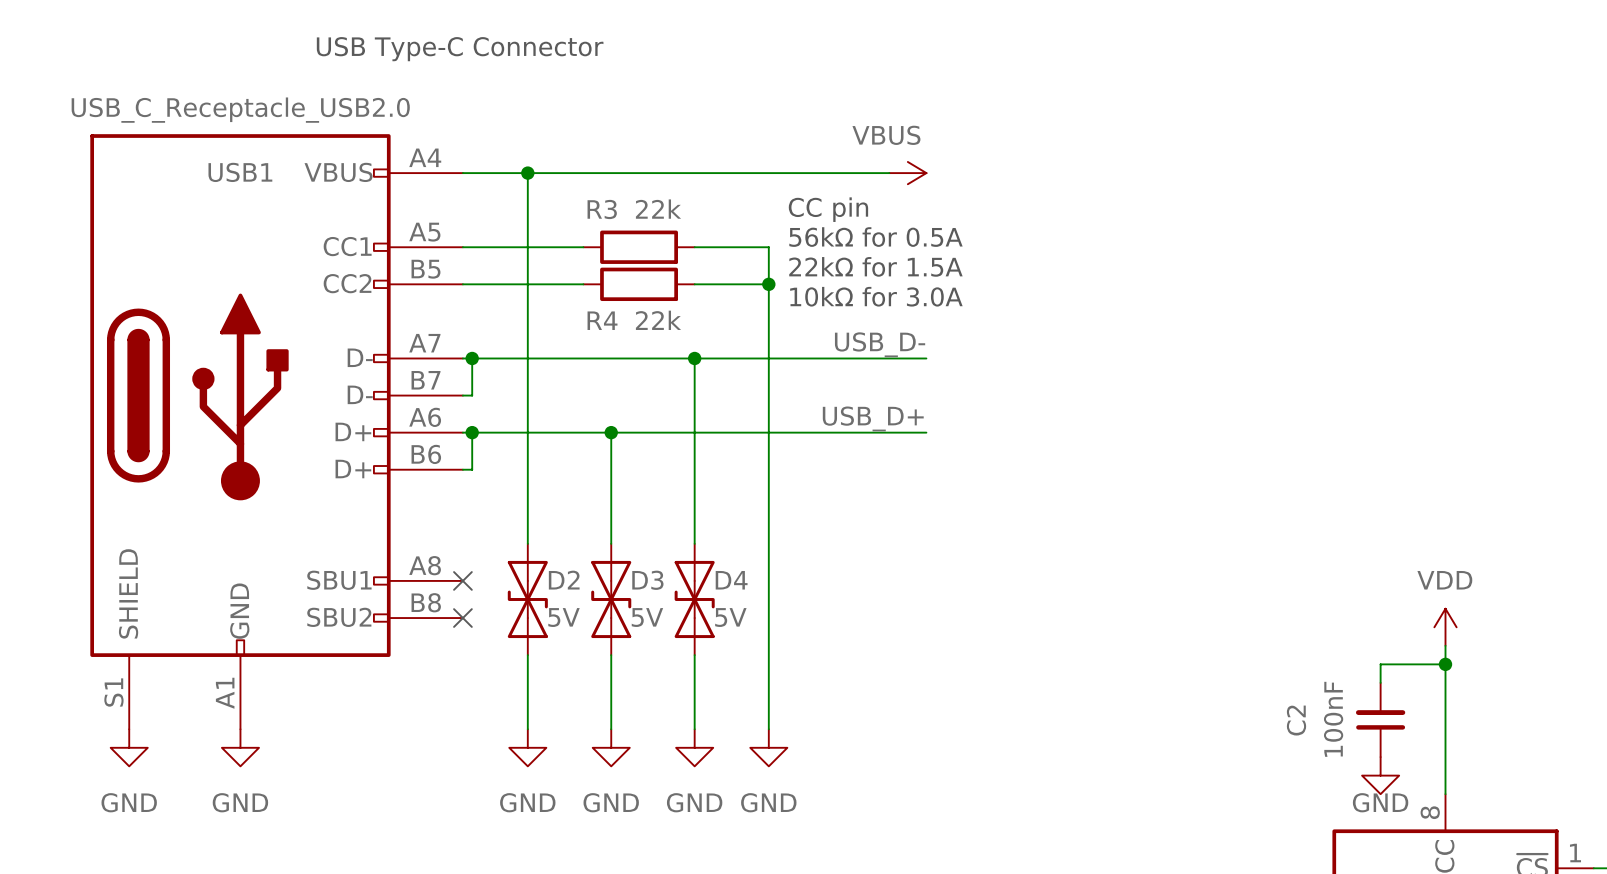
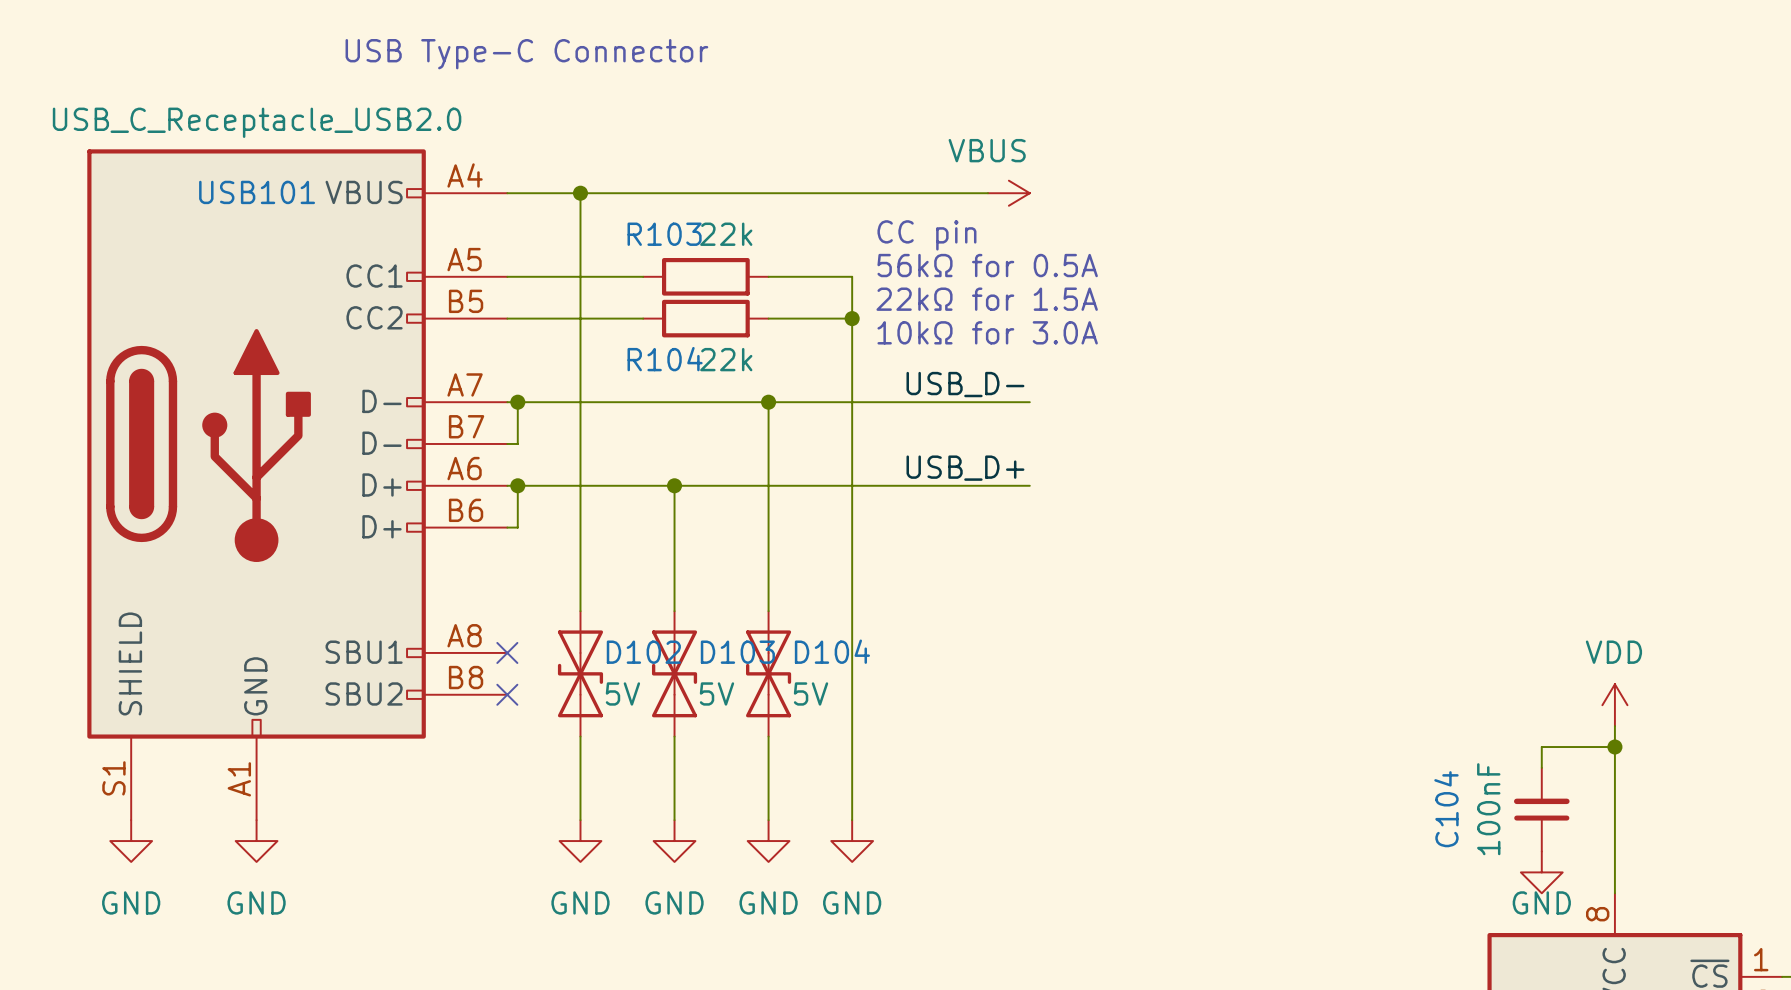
USB1 name: USB1 (240, 172) -> USB101 (257, 192)
R3 name: R3 (602, 209) -> R103 (664, 234)
R4 name: R4 (602, 320) -> R104 (665, 359)
D2 name: D2 (564, 580) -> D102 (643, 652)
D3 name: D3 (647, 580) -> D103 (737, 652)
D4 name: D4 (731, 580) -> D104 (832, 651)
C2 name: C2 (1296, 720) -> C104 (1446, 809)

